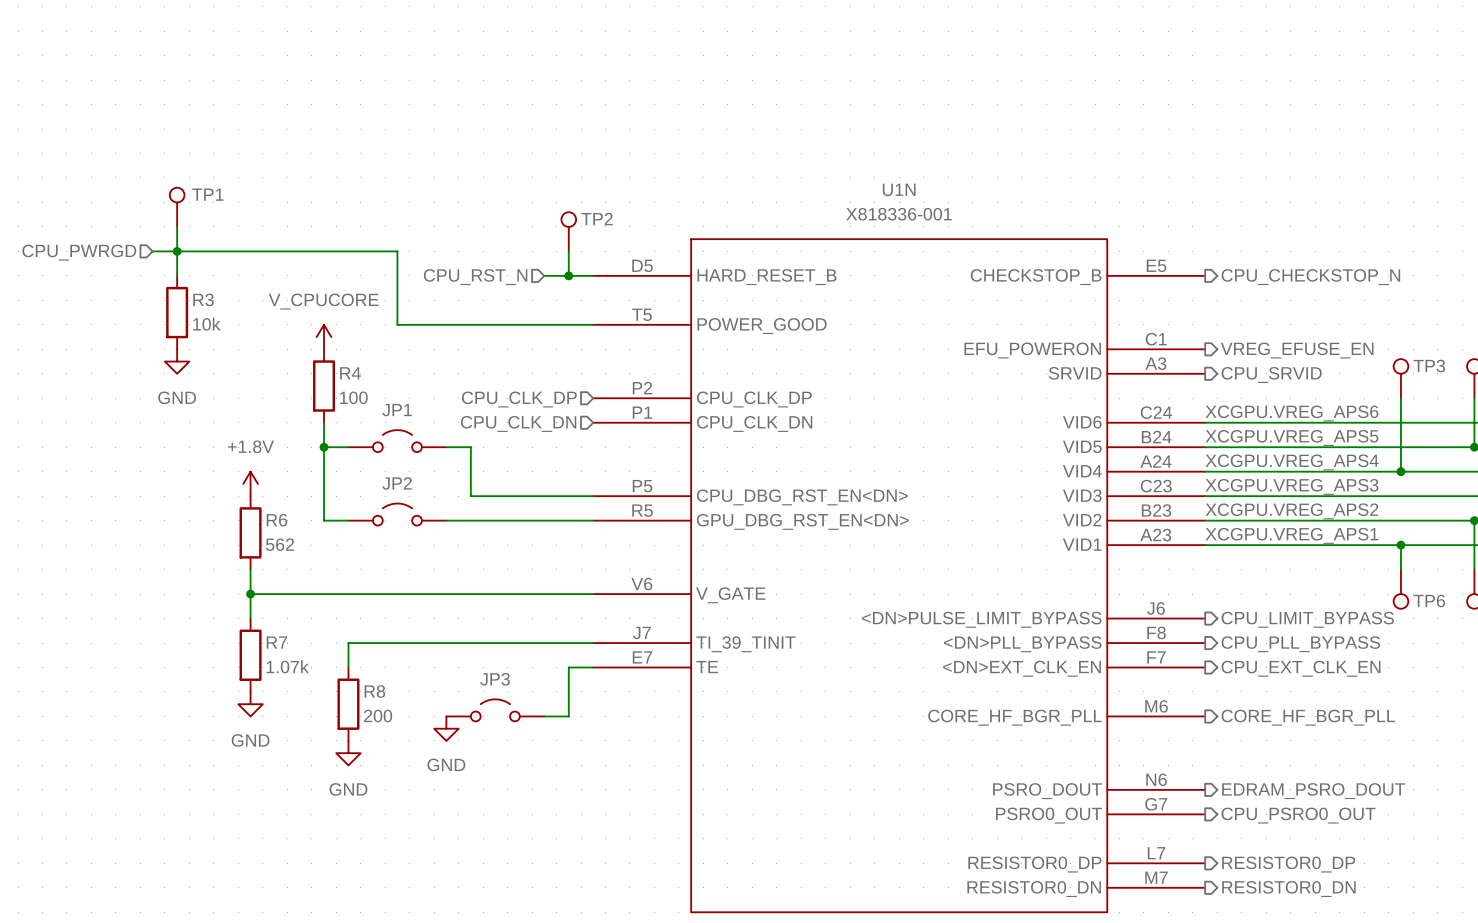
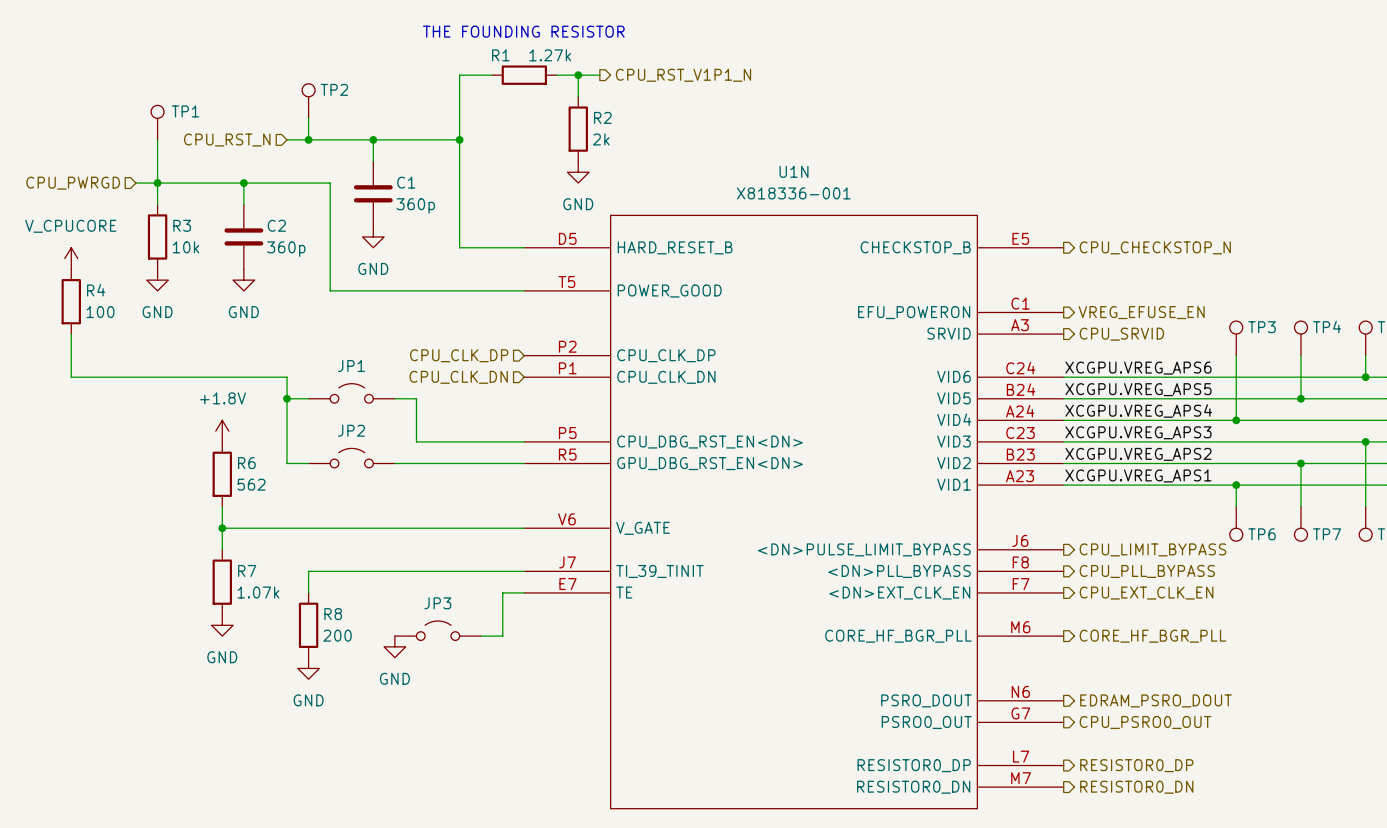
text: none -> THE FOUNDING RESISTOR (523, 31)
wire: none -> (491, 75) (459, 75) (459, 247) (481, 247)
R1: none -> 1.27k (524, 75)
wire: none -> (556, 75) (599, 75)
wire: none -> (578, 75) (578, 96)
junction: none -> (578, 75)
hierarchical label: none -> CPU_RST_V1P1_N (683, 75)
wire: none -> (308, 118) (308, 139)
R2: none -> 2k (578, 129)
wire: none -> (287, 139) (459, 139)
junction: none -> (308, 139)
junction: none -> (373, 139)
junction: none -> (459, 139)
hierarchical label: none -> CPU_RST_N (227, 140)
power symbol: none -> GND (578, 172)
wire: none -> (243, 183) (243, 204)
junction: none -> (243, 183)
TP1 position: (177, 207) -> (157, 122)
C1: none -> 360p (373, 193)
wire: (177, 226) (177, 275) -> (157, 204) (157, 139)
TP2 position: (568, 231) -> (308, 101)
wire: (152, 251) (397, 251) (397, 324) -> (136, 183) (330, 183) (330, 290) (351, 290)
junction position: (177, 251) -> (157, 183)
wire: (568, 251) (568, 275) -> (373, 139) (373, 161)
hierarchical label position: CPU_PWRGD (79, 252) -> CPU_PWRGD (73, 183)
C2: none -> 360p (243, 236)
power symbol: none -> GND (373, 236)
junction: (568, 275) -> none
hierarchical label: CPU_RST_N (475, 277) -> none
power symbol: none -> V_CPUCORE (71, 258)
R3 position: (177, 312) -> (157, 236)
power symbol: none -> GND (243, 280)
power symbol: V_CPUCORE (324, 337) -> none
power symbol position: GND (177, 361) -> GND (157, 280)
wire: none -> (71, 334) (71, 377) (287, 377)
R4 position: (324, 386) -> (71, 301)

